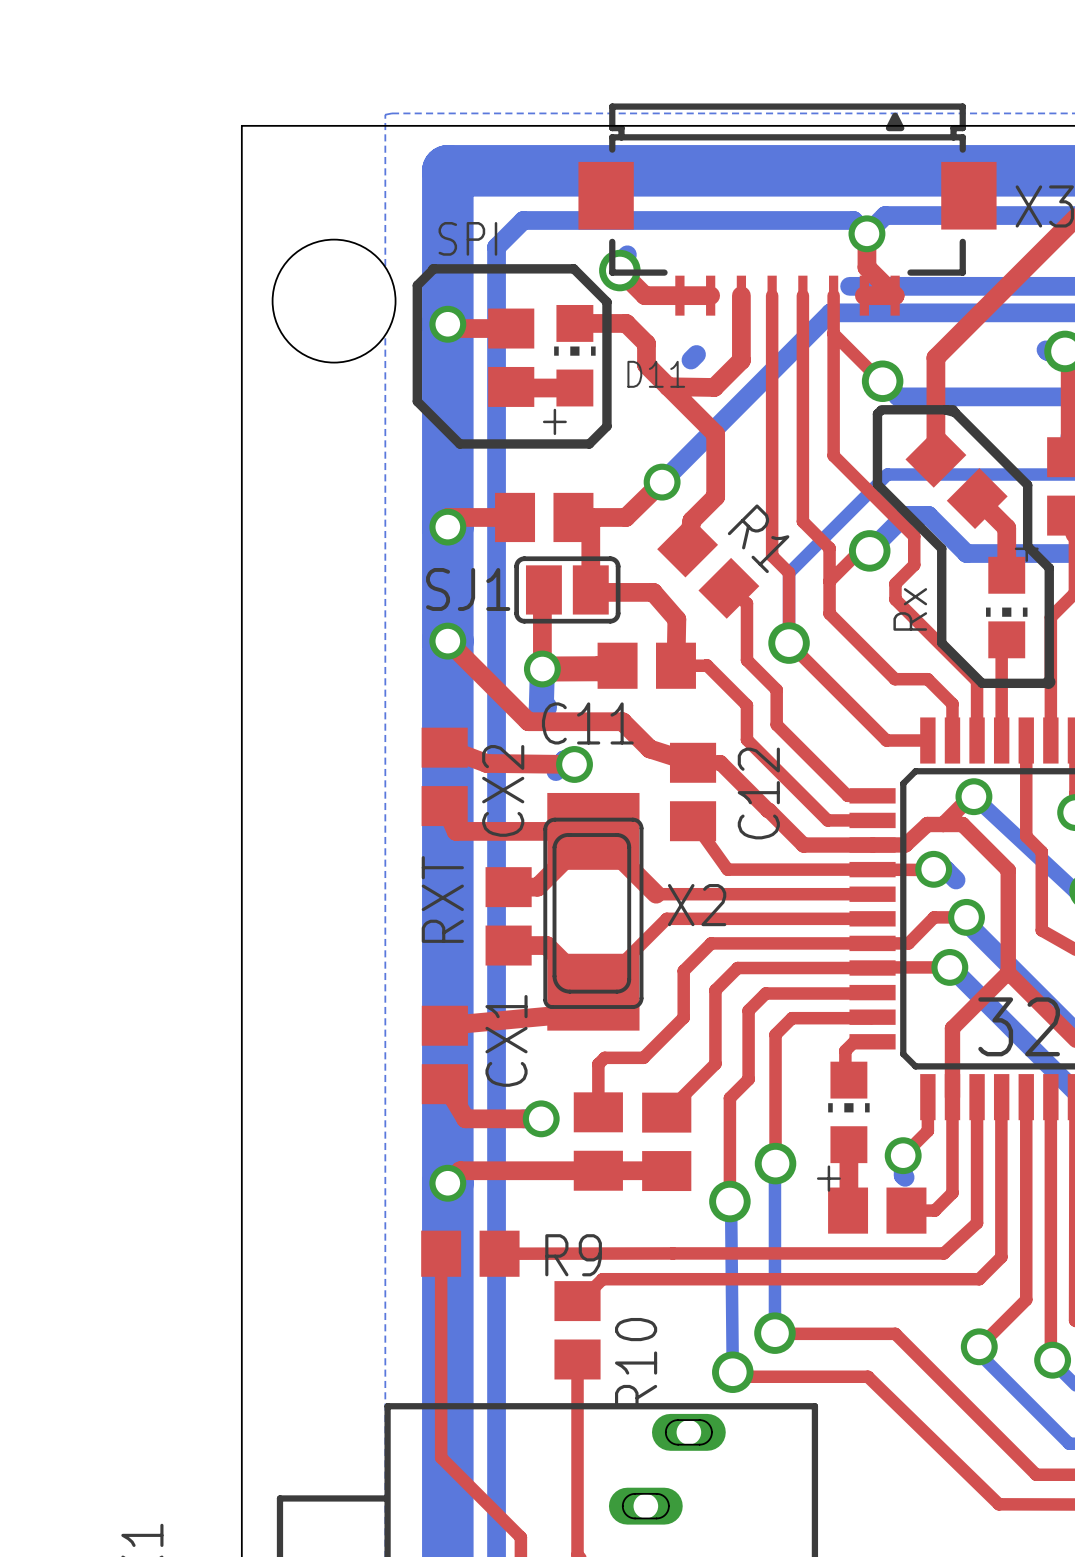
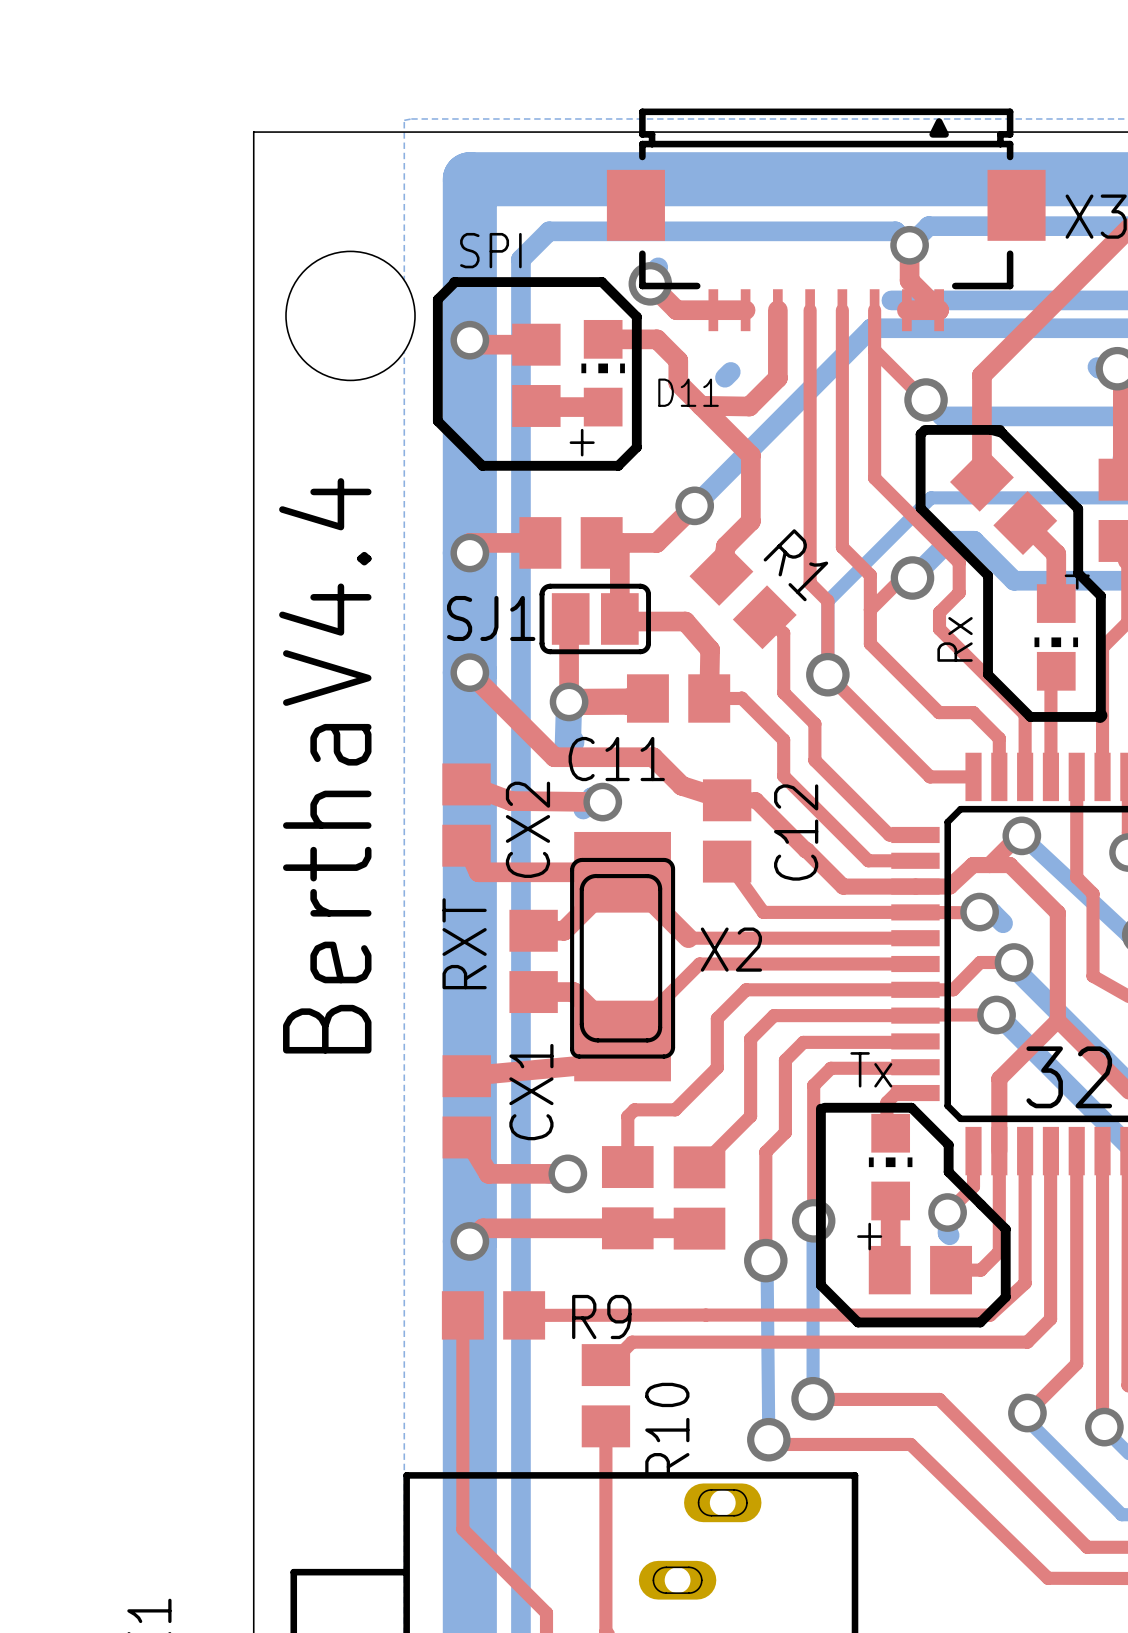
text: none -> BerthaV4.4 (325, 765)
text: none -> Tx (871, 1069)
line: none -> (824, 1107) (911, 1107) (948, 1144) (948, 1172) (1005, 1229) (1005, 1297) (980, 1322) (858, 1322) (820, 1285) (820, 1108)

